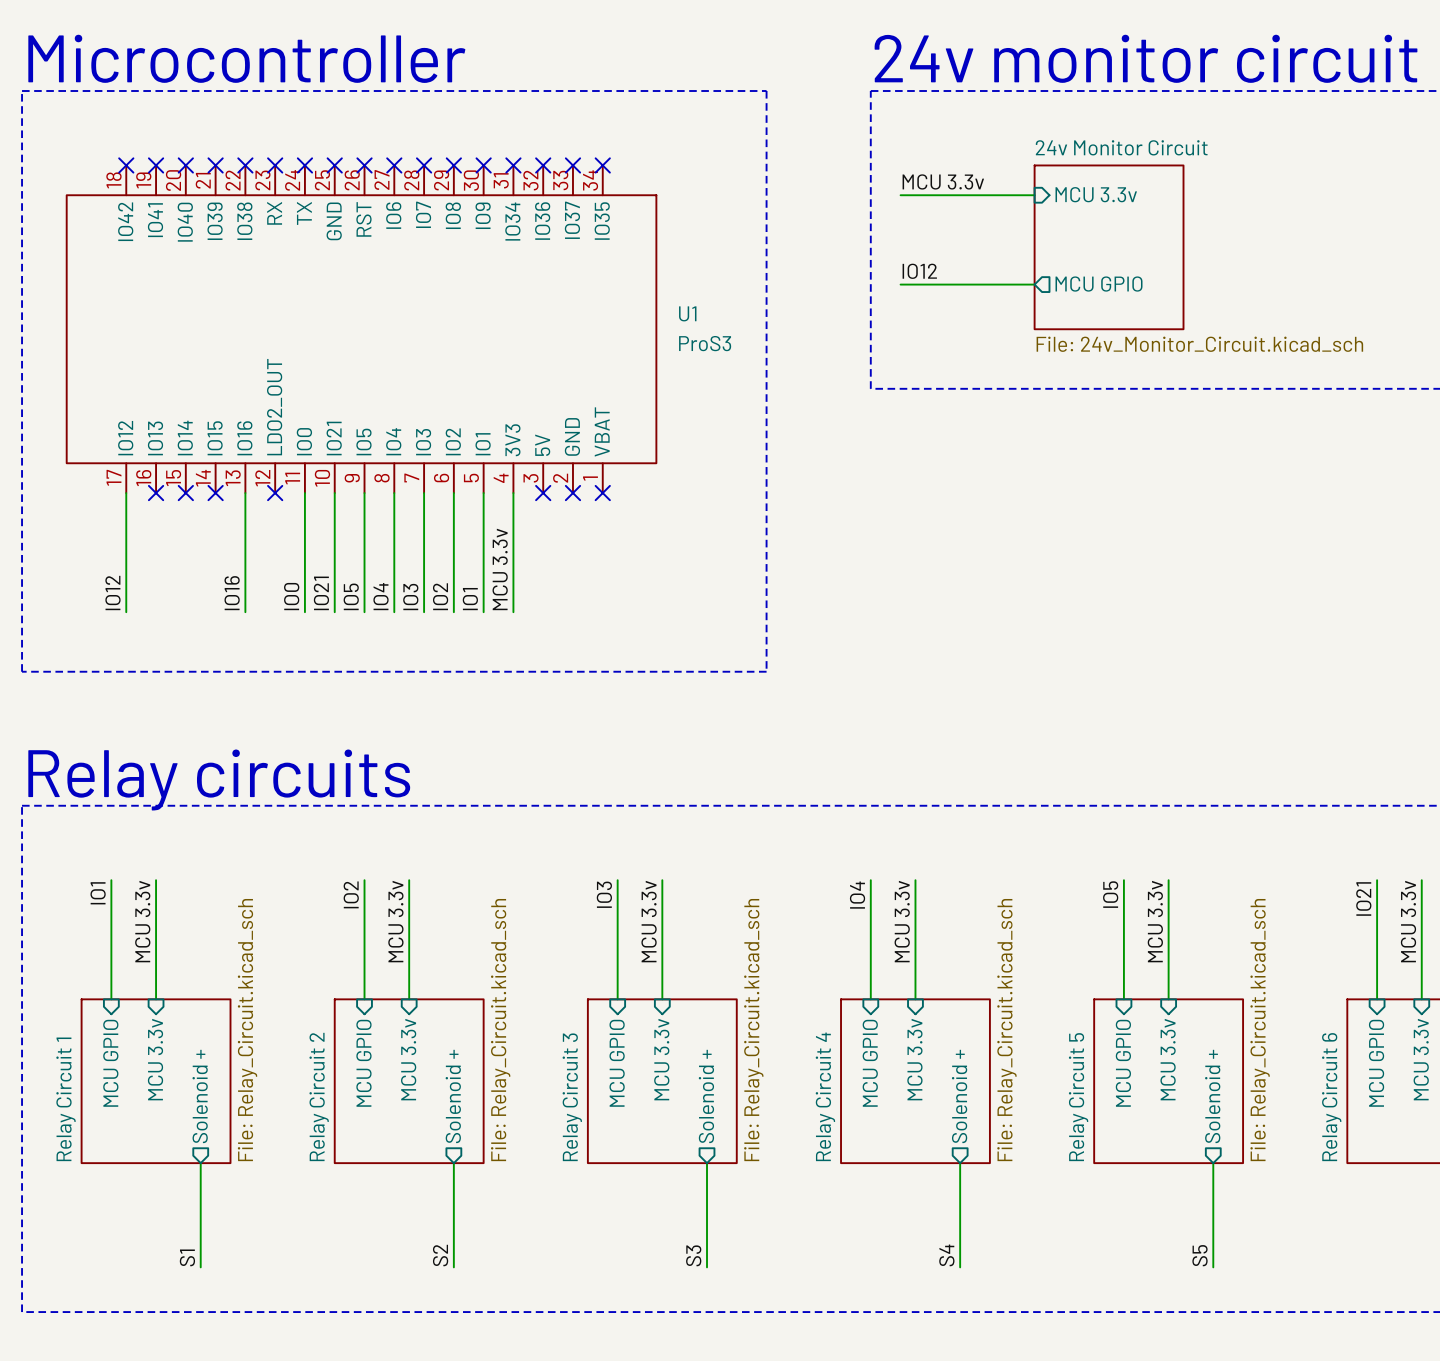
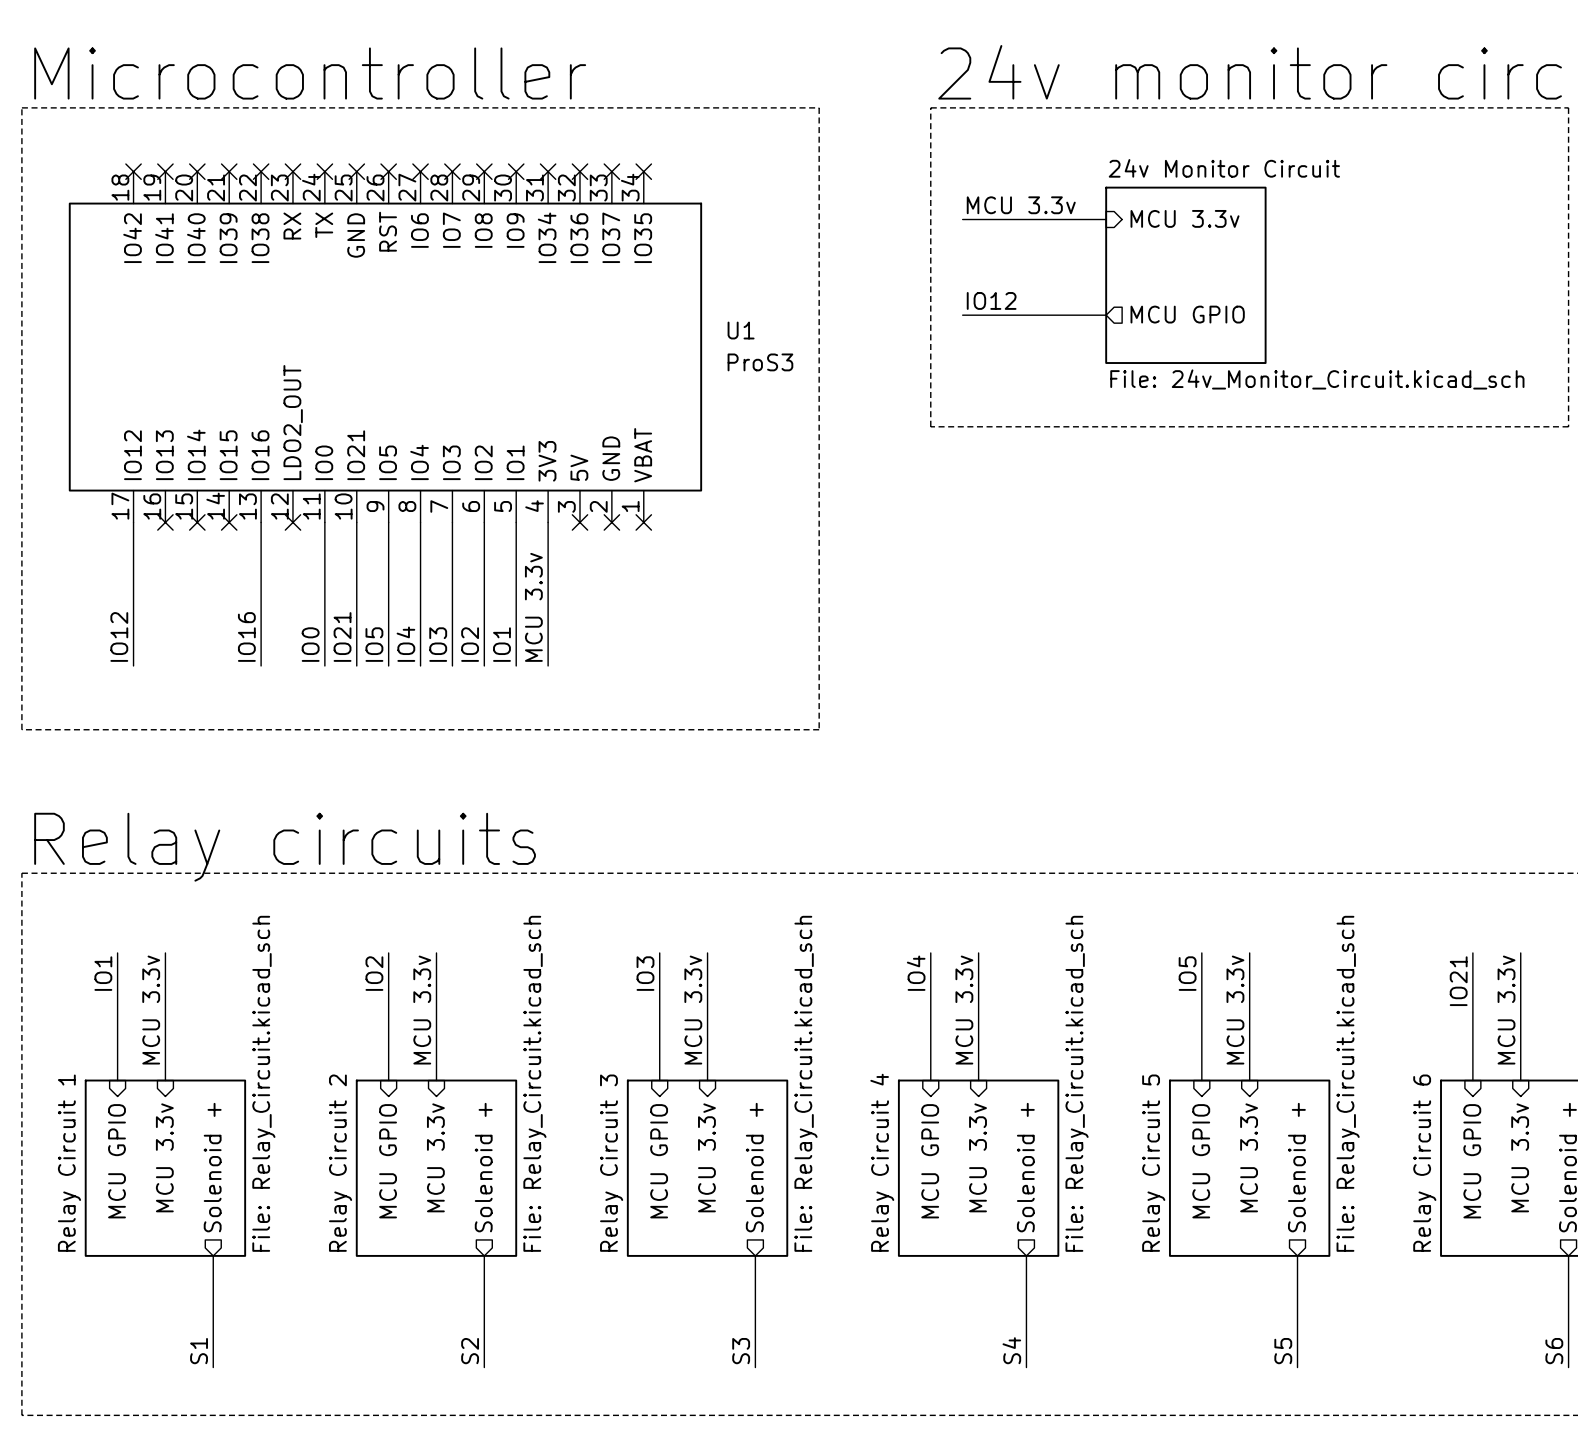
no-connect mark position: (126, 165) -> (133, 171)
no-connect mark position: (156, 165) -> (165, 171)
no-connect mark position: (185, 165) -> (197, 171)
no-connect mark position: (215, 165) -> (229, 171)
no-connect mark position: (245, 165) -> (261, 171)
no-connect mark position: (275, 165) -> (292, 171)
no-connect mark position: (304, 165) -> (324, 171)
no-connect mark position: (334, 165) -> (356, 171)
no-connect mark position: (364, 165) -> (388, 171)
no-connect mark position: (394, 165) -> (420, 171)
no-connect mark position: (424, 165) -> (452, 171)
no-connect mark position: (453, 165) -> (484, 171)
no-connect mark position: (483, 165) -> (516, 171)
no-connect mark position: (513, 165) -> (548, 171)
no-connect mark position: (543, 165) -> (579, 171)
no-connect mark position: (572, 165) -> (611, 171)
no-connect mark position: (602, 165) -> (643, 171)
U1 position: (361, 329) -> (385, 347)
no-connect mark position: (156, 493) -> (165, 522)
no-connect mark position: (185, 493) -> (197, 522)
no-connect mark position: (215, 493) -> (229, 522)
no-connect mark position: (275, 493) -> (292, 522)
no-connect mark position: (543, 493) -> (579, 522)
no-connect mark position: (572, 493) -> (611, 522)
no-connect mark position: (602, 493) -> (643, 522)

